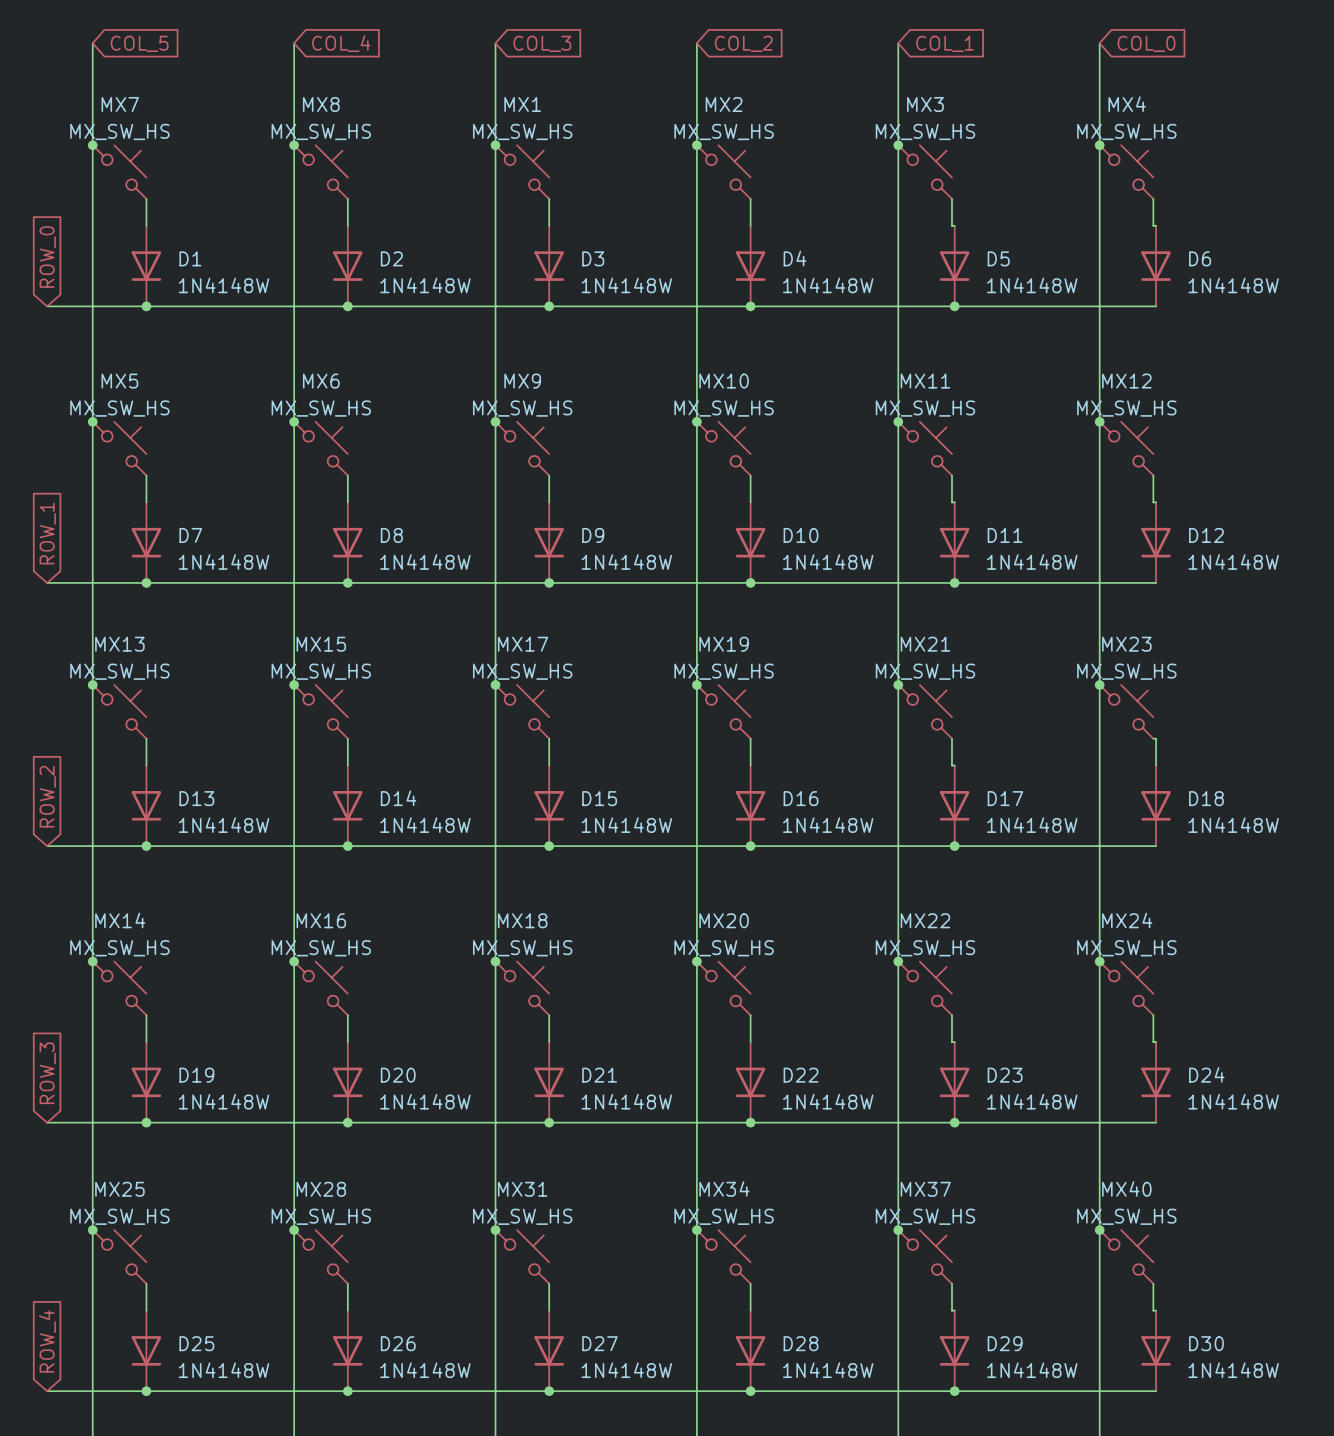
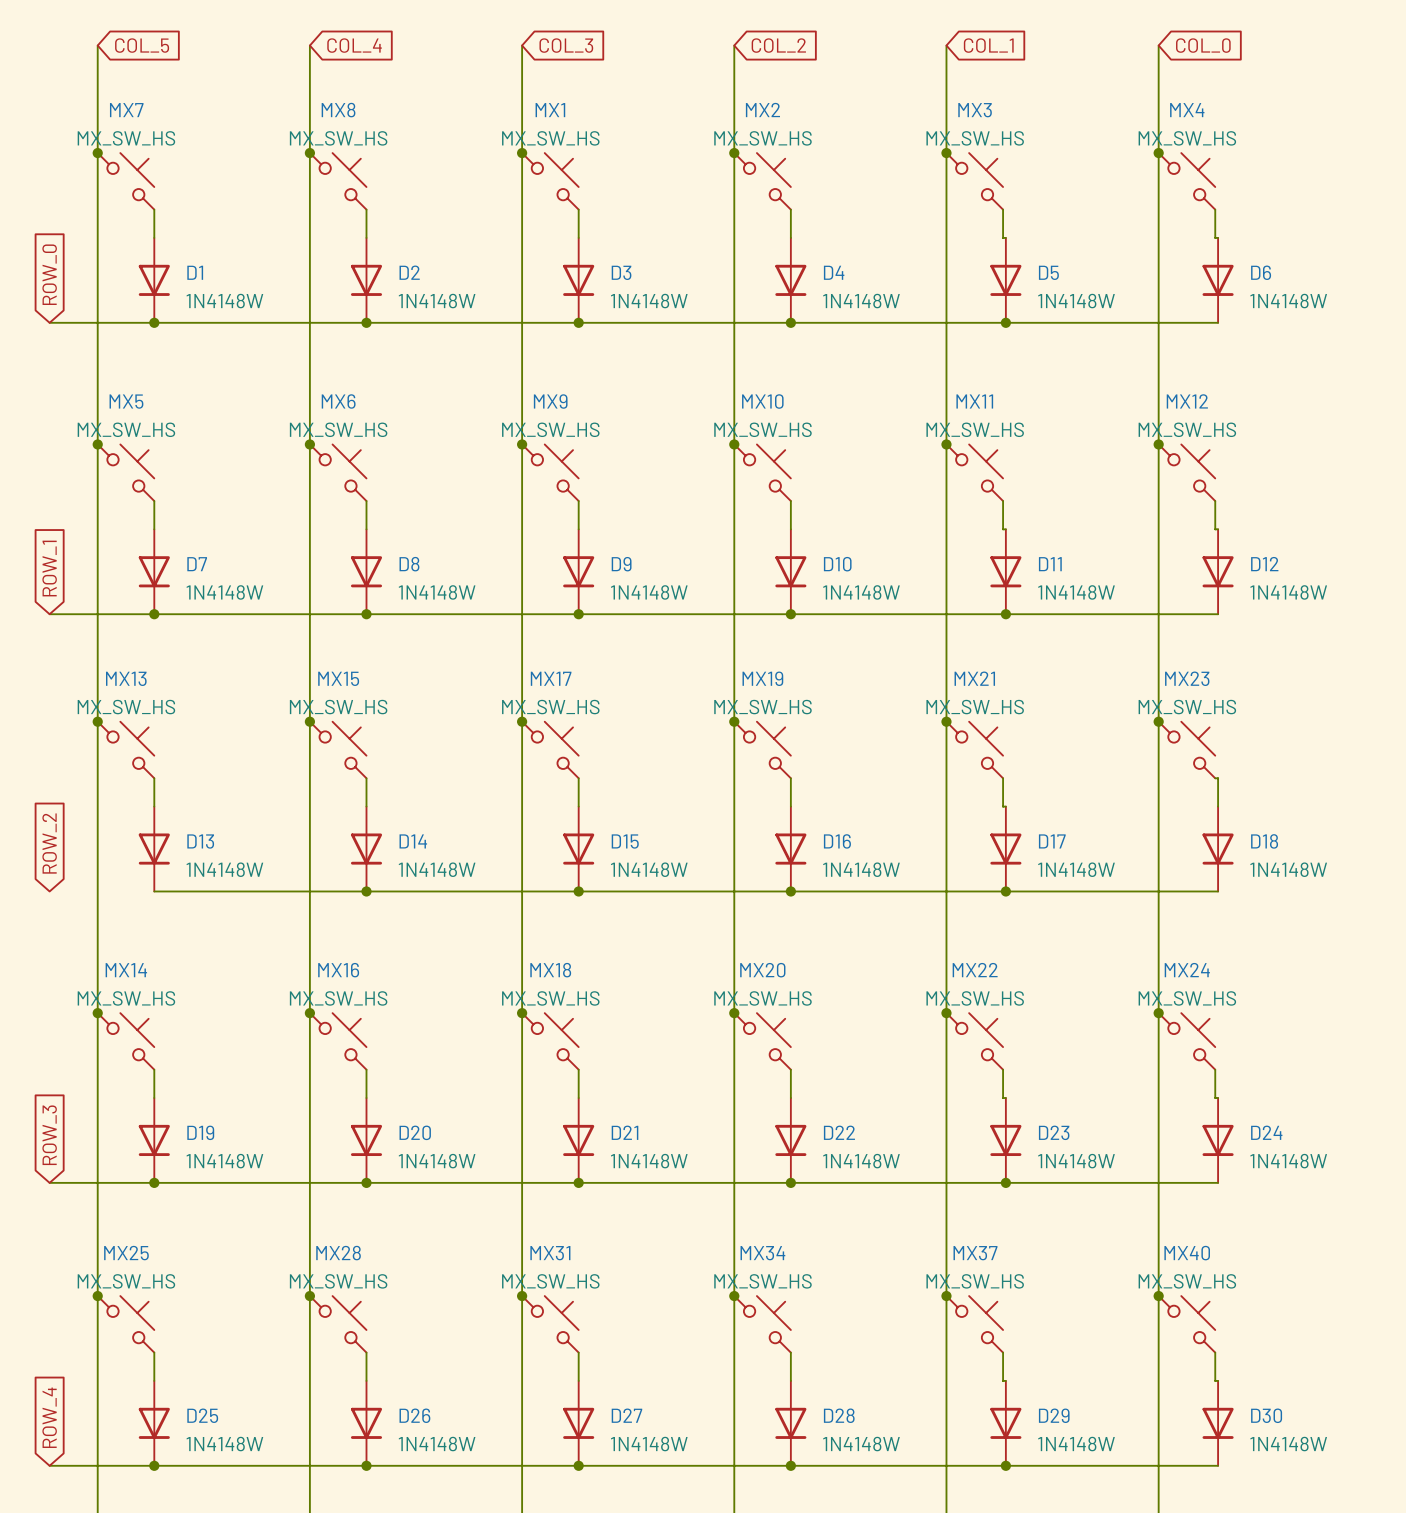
wire: (47, 846) (146, 846) -> none
junction: (146, 846) -> none

